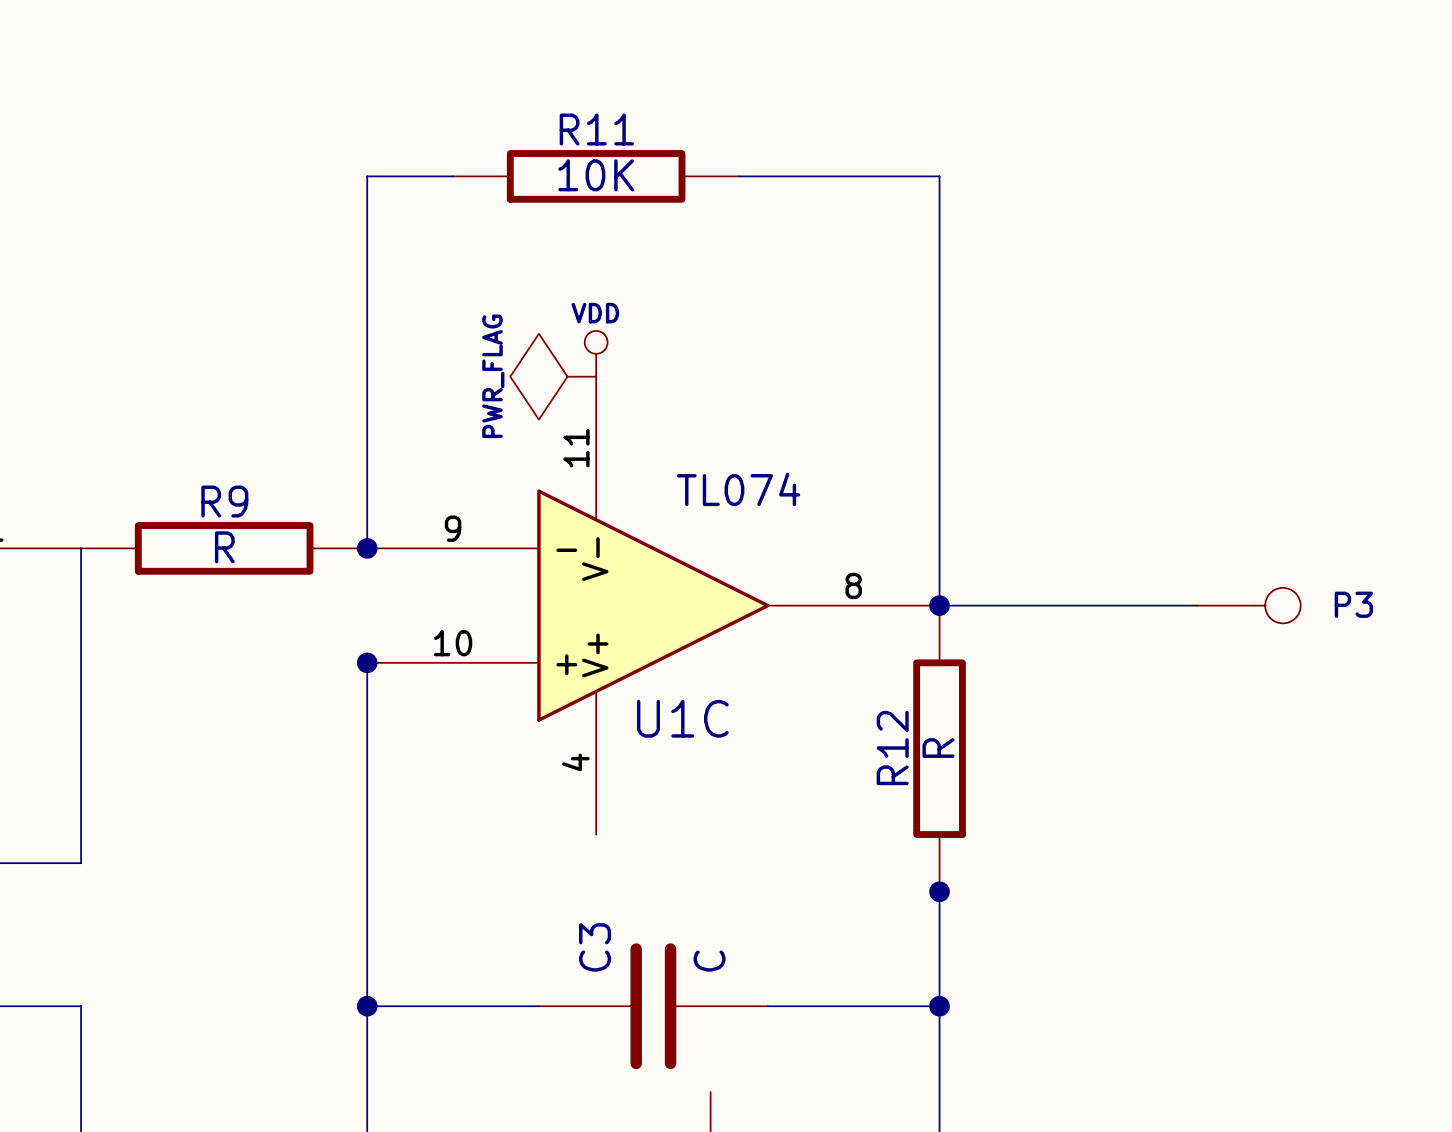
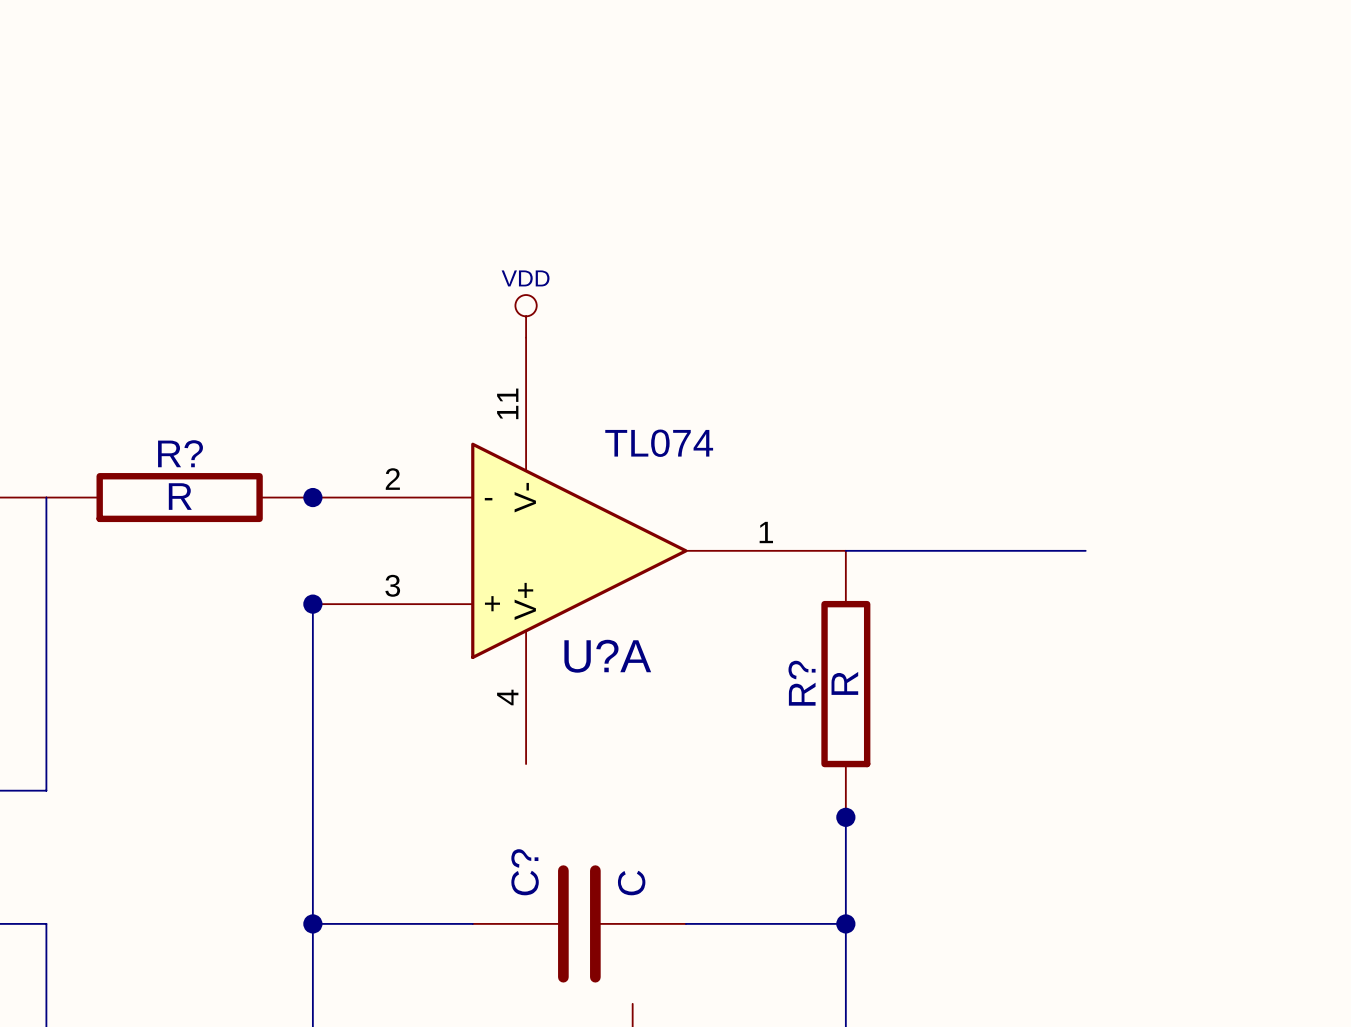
wire: (453, 176) (367, 176) (367, 548) -> none
R11: 10K (596, 176) -> none
wire: (739, 176) (939, 176) (939, 605) -> none
power symbol: PWR_FLAG (553, 376) -> none
R9 name: R9 (224, 501) -> R? (180, 453)
U1C pin number: 9 (453, 528) -> 2 (392, 479)
U1C pin number: 8 (853, 585) -> 1 (766, 532)
junction: (939, 605) -> none
P3: (1248, 605) -> none
U1C pin number: 10 (453, 643) -> 3 (392, 585)
U1C name: U1C (682, 718) -> U?A (607, 656)
R12 name: R12 (892, 748) -> R? (802, 683)
C3 name: C3 (595, 947) -> C? (525, 872)

